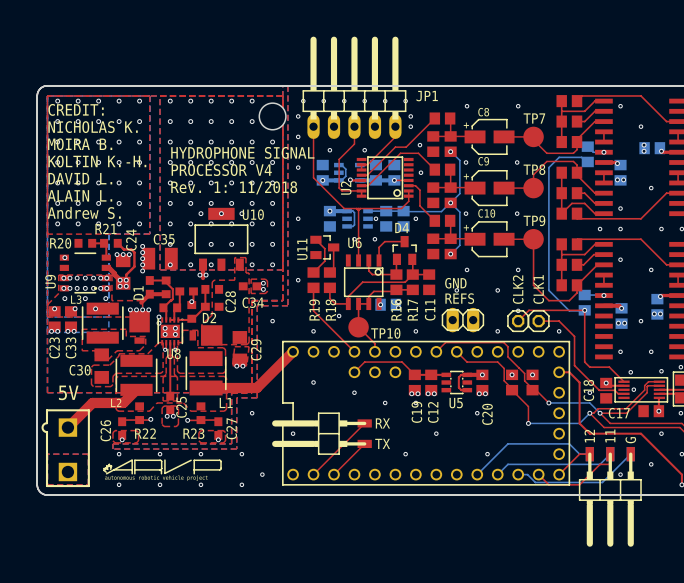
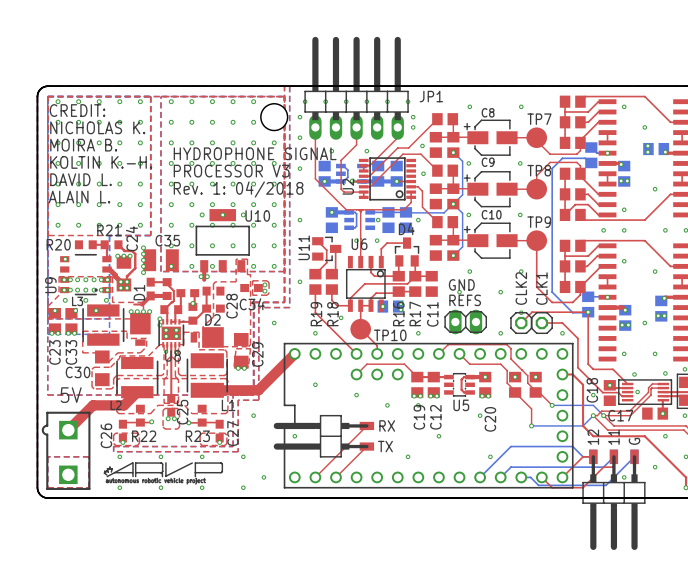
text: PROCESSOR V4 (221, 170) -> PROCESSOR V3 (231, 171)
text: Rev. 1: 11/2018 (234, 187) -> Rev. 1: 04/2018 (238, 189)
text: Andrew S. (84, 212) -> none
top track: none -> (134, 304) (142, 304)

